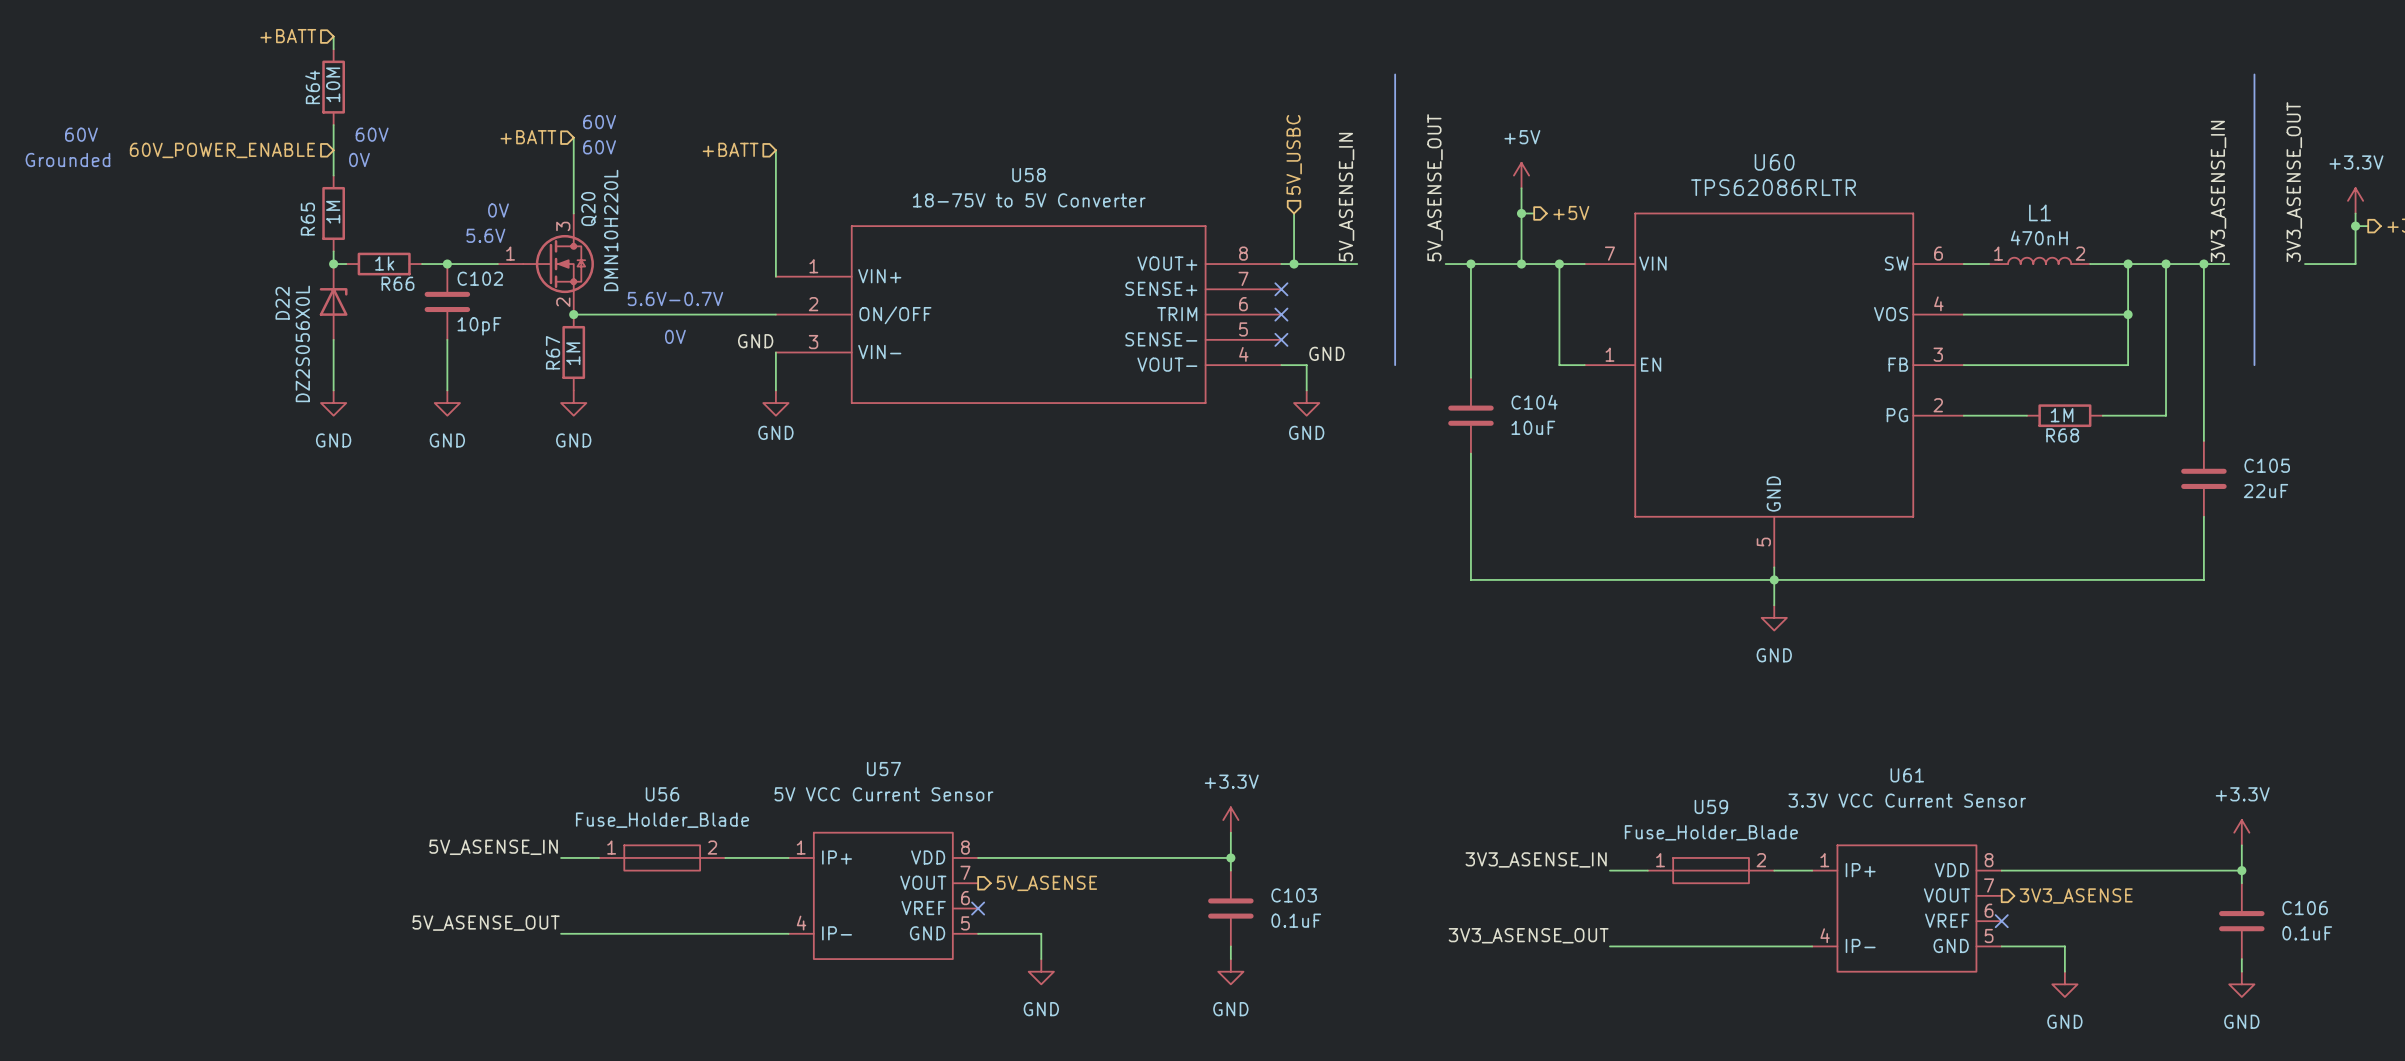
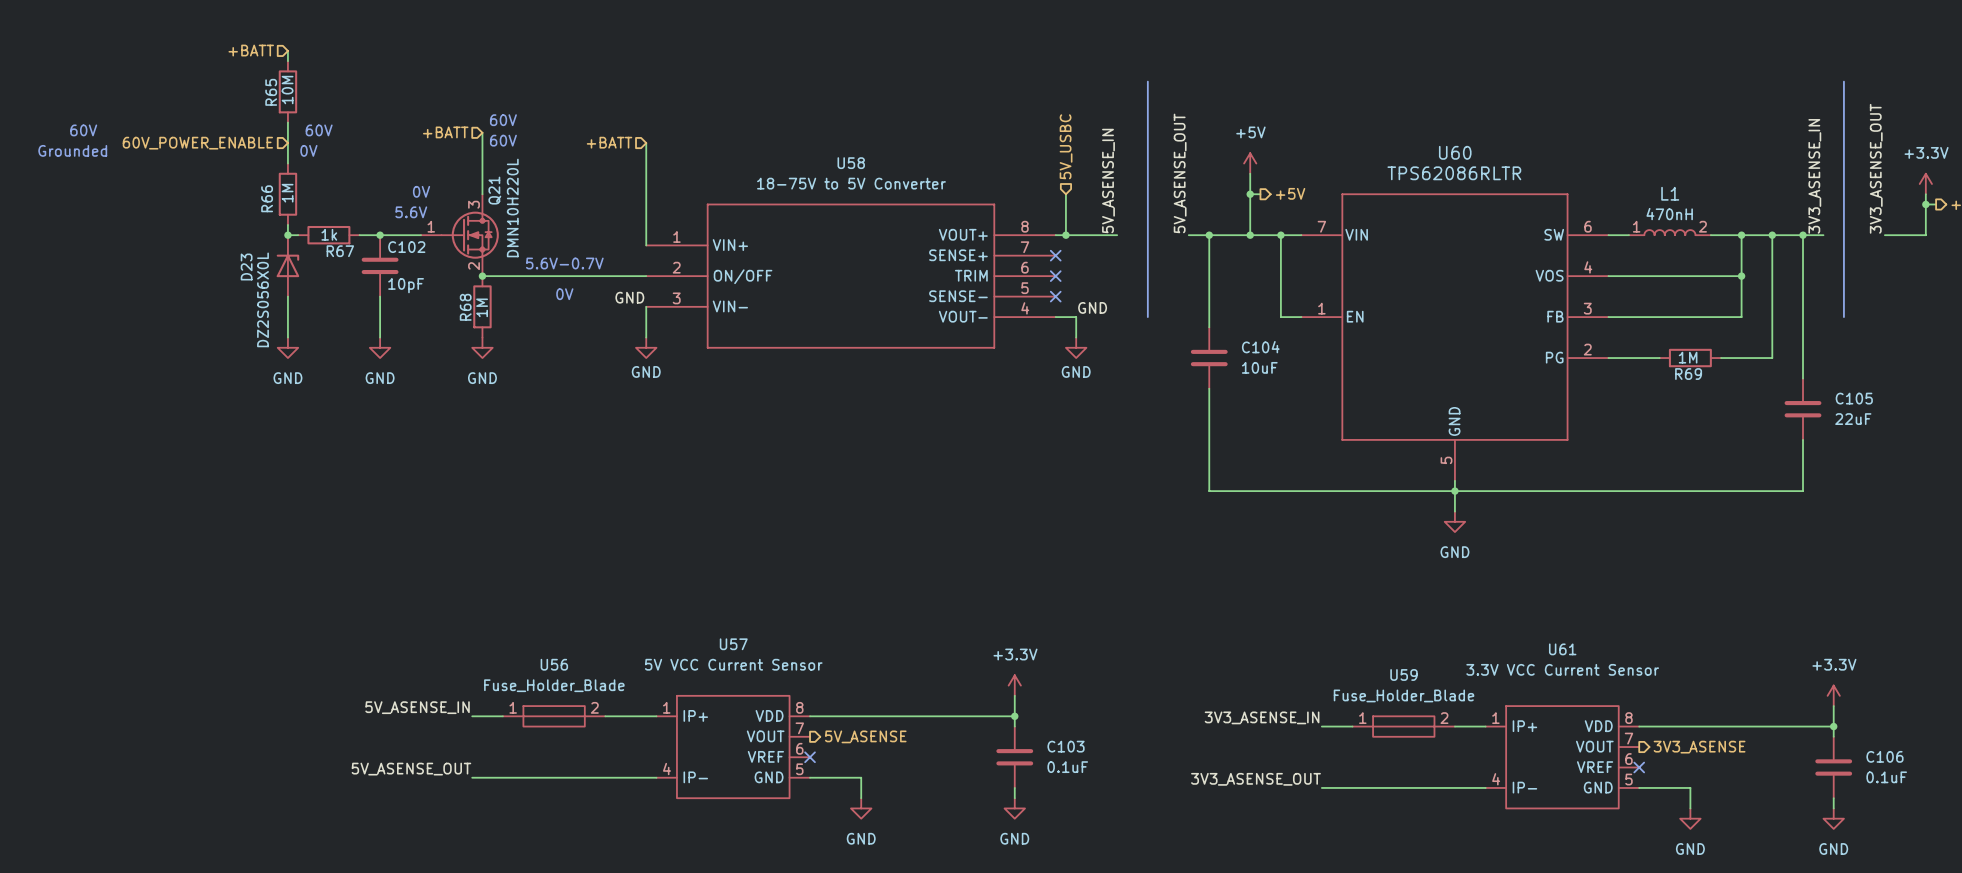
R64 name: R64 (312, 87) -> R65 (271, 92)
Q20 name: Q20 (589, 208) -> Q21 (494, 190)
R65 name: R65 (307, 219) -> R66 (267, 198)
R66 name: R66 (397, 283) -> R67 (340, 251)
D22 name: D22 (282, 303) -> D23 (246, 266)
R67 name: R67 (553, 352) -> R68 (465, 307)
R68 name: R68 (2062, 435) -> R69 (1688, 374)

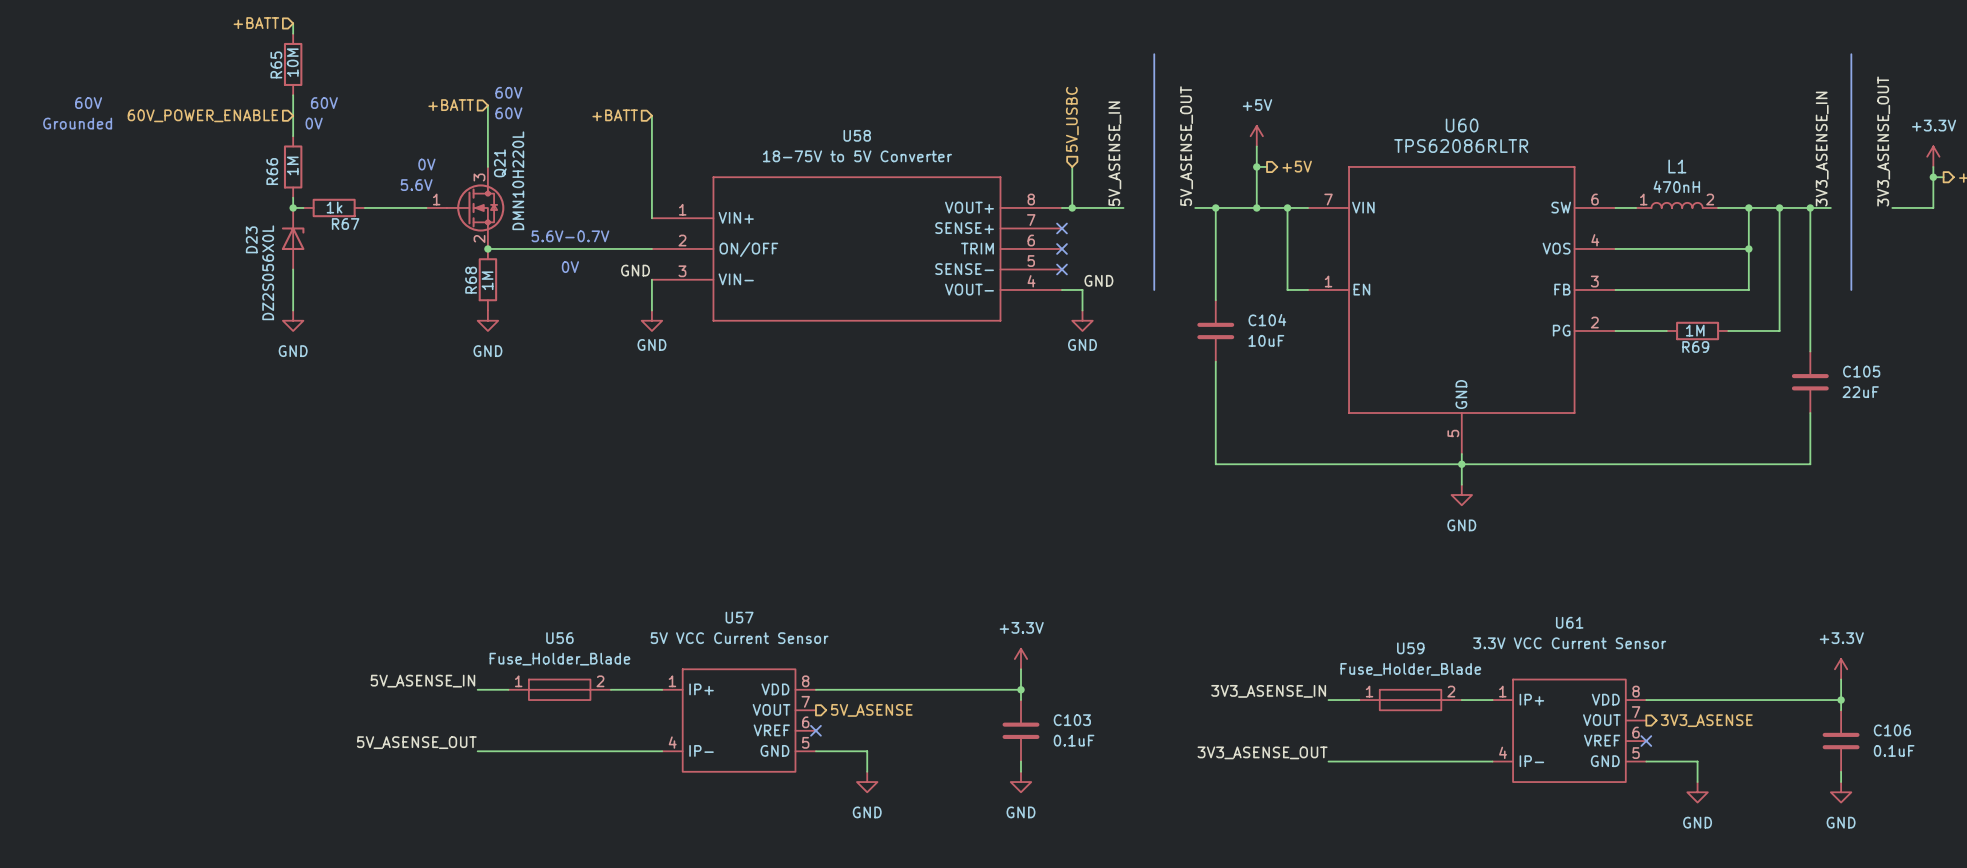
junction: (380, 235) -> none
C102: 10pF (380, 265) -> none
wire: (380, 296) (380, 337) -> none
power symbol: GND (380, 347) -> none

